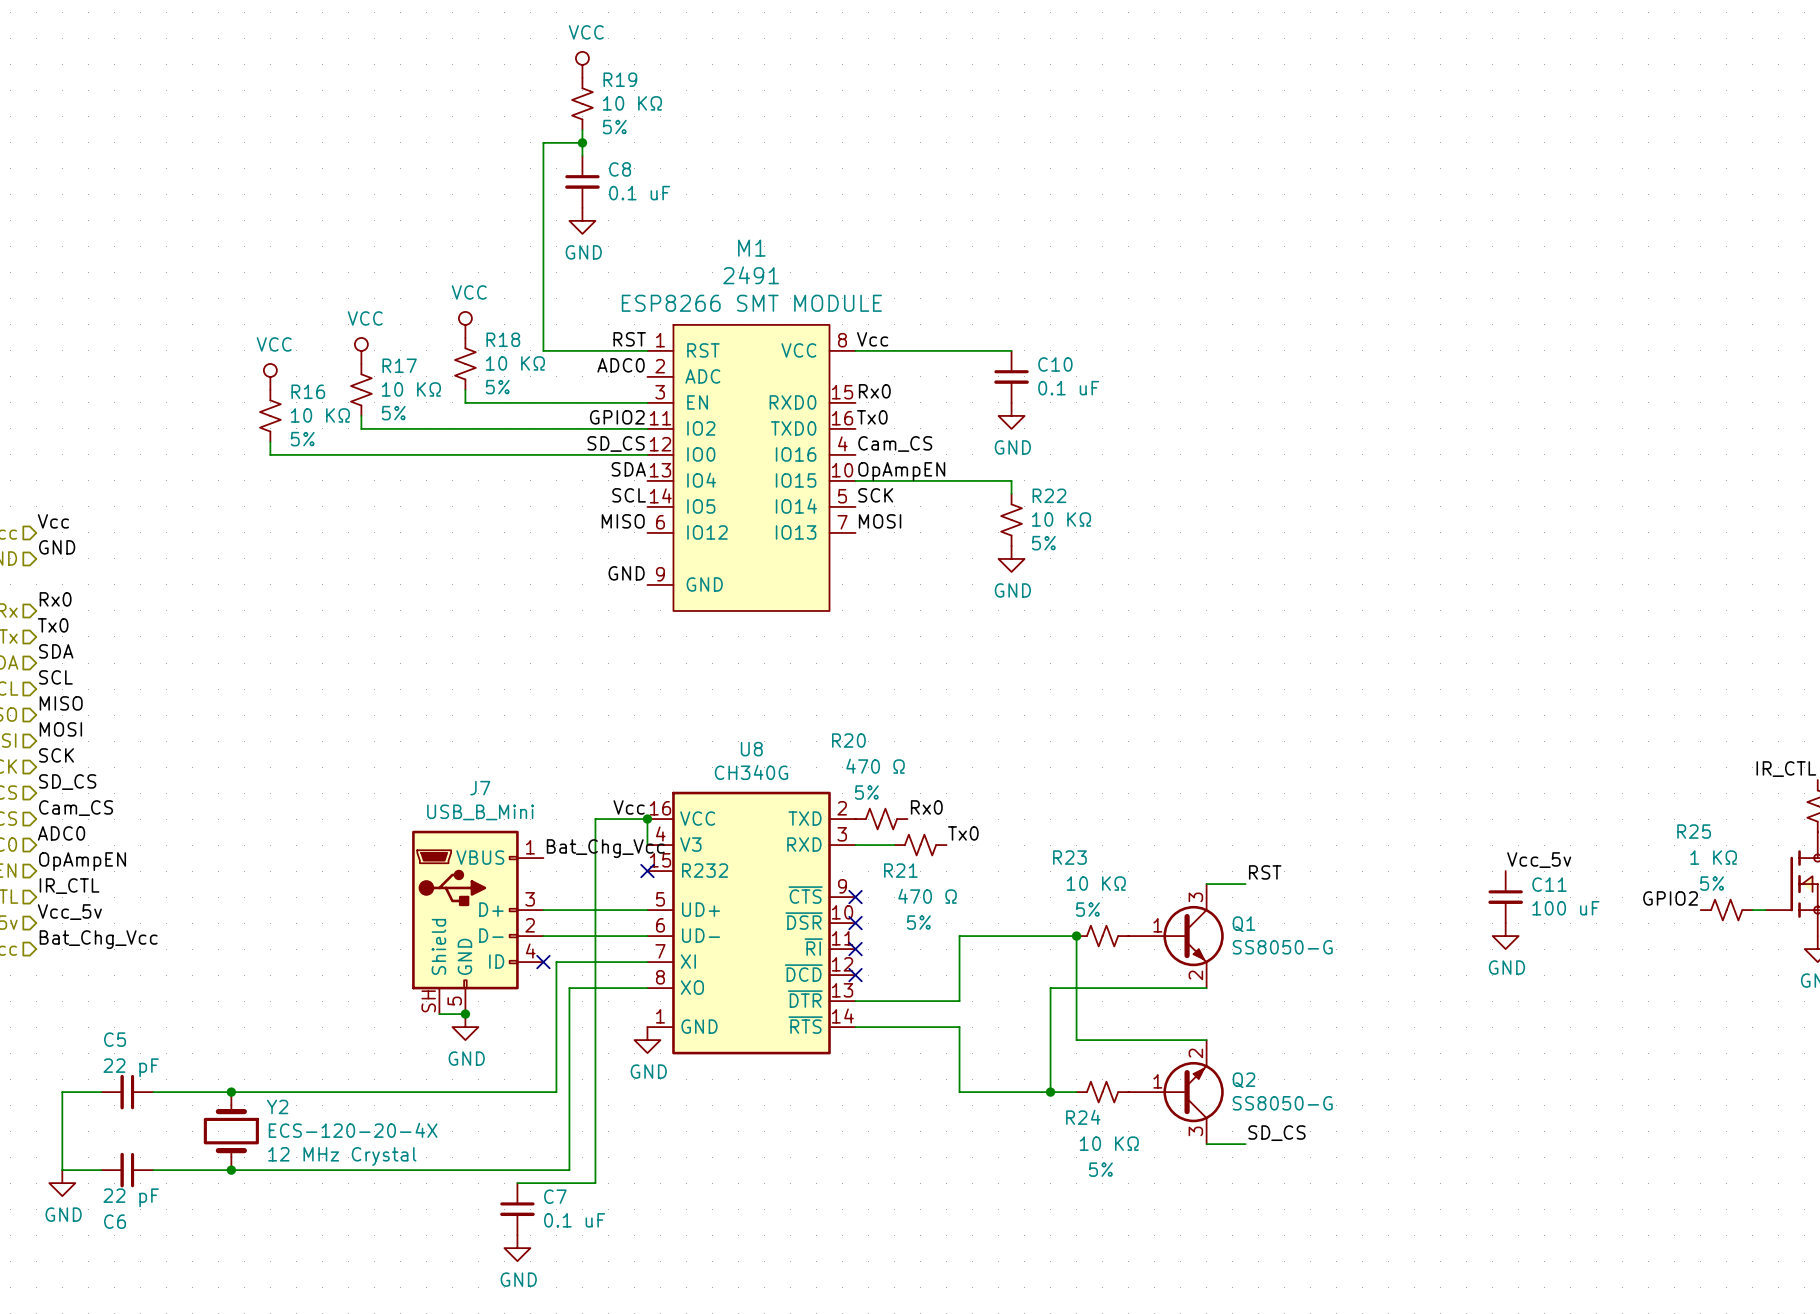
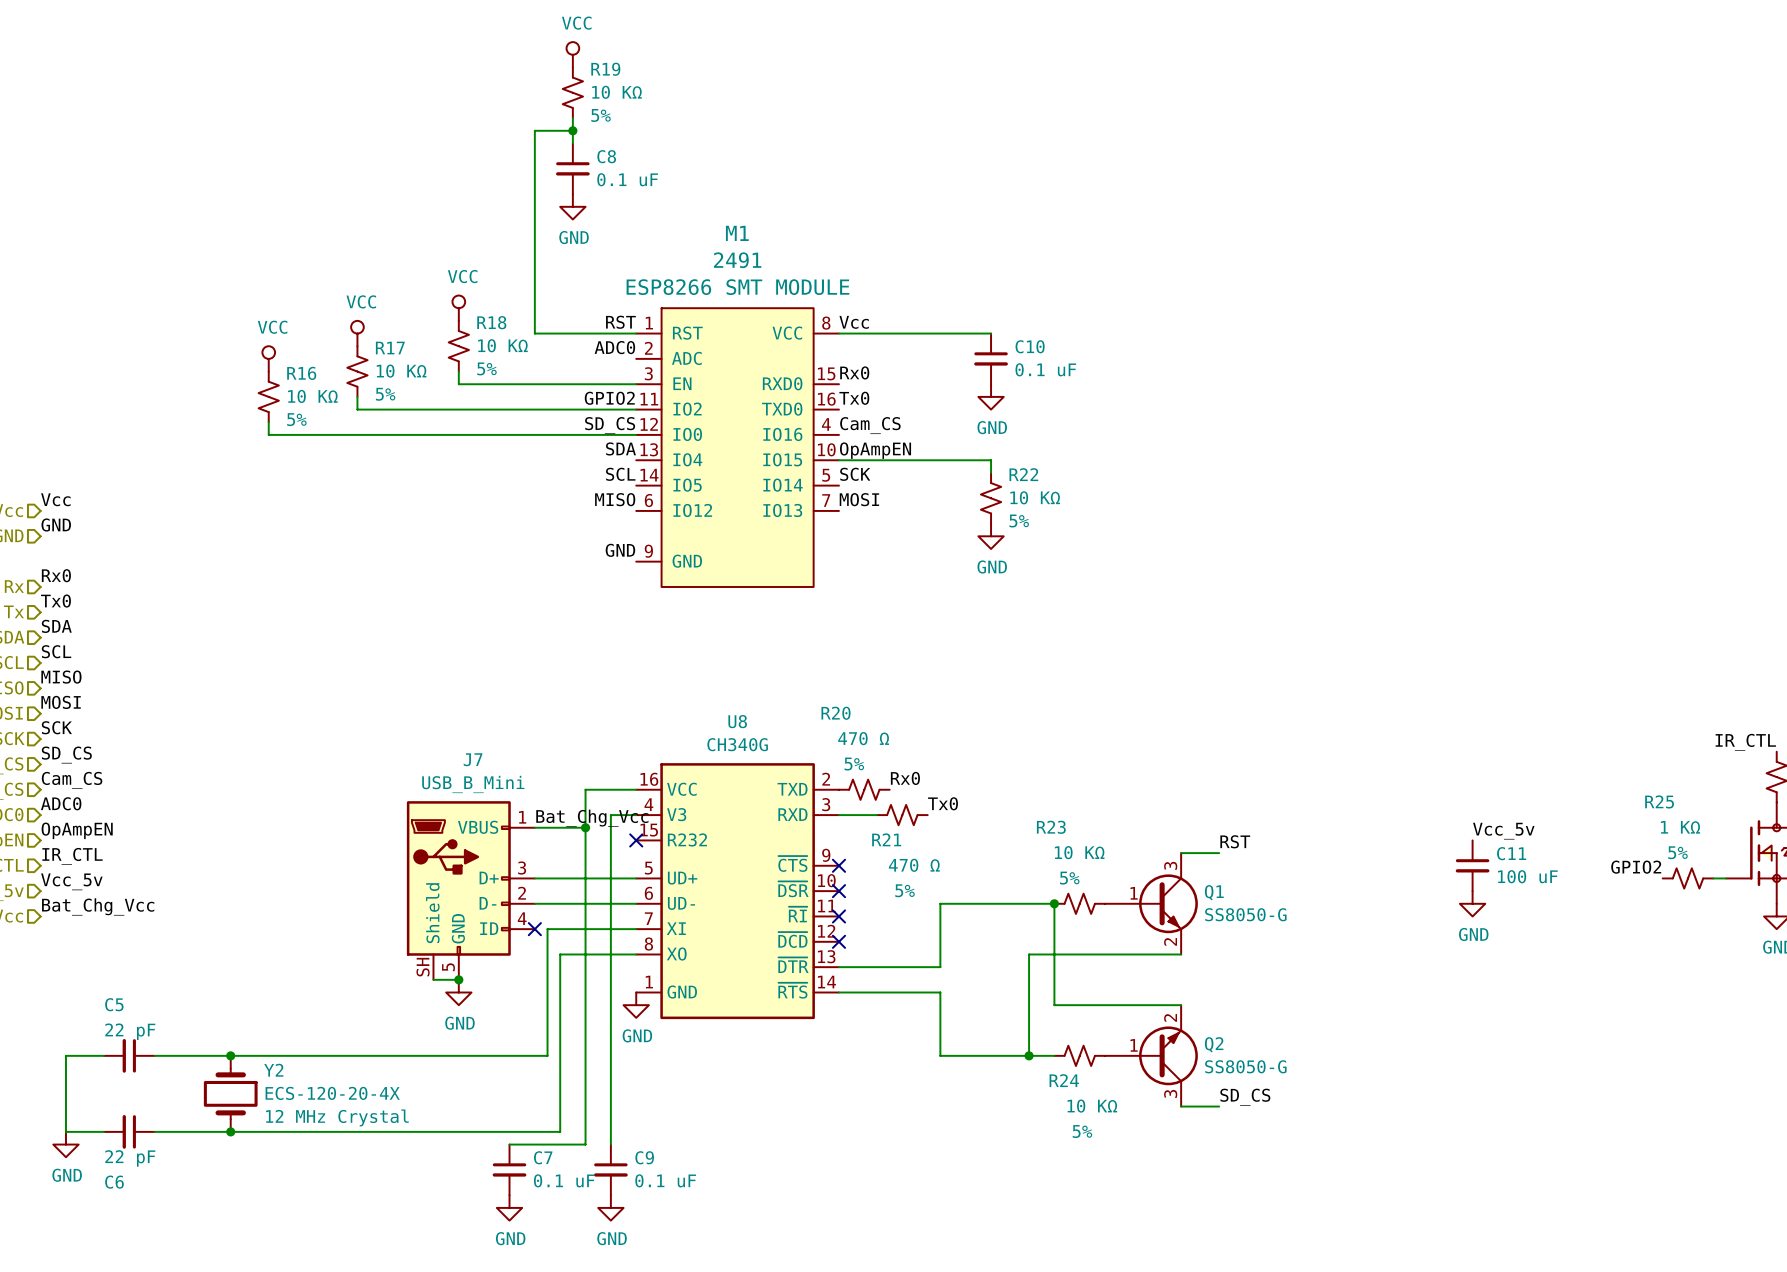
label: Vcc (629, 807) -> none
wire: (647, 819) (647, 845) -> (610, 1144) (610, 815) (636, 815)
junction: (647, 819) -> none
wire: none -> (534, 827) (585, 827)
junction: none -> (585, 827)
C9: none -> 0.1 uF (610, 1169)
power symbol: none -> GND (610, 1207)

